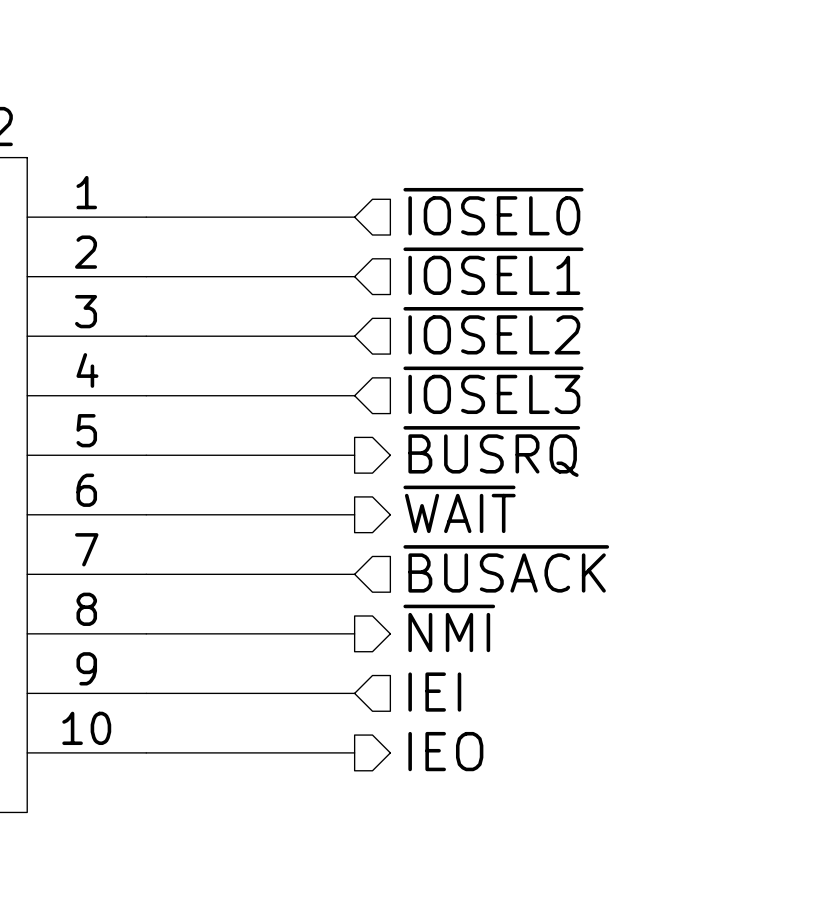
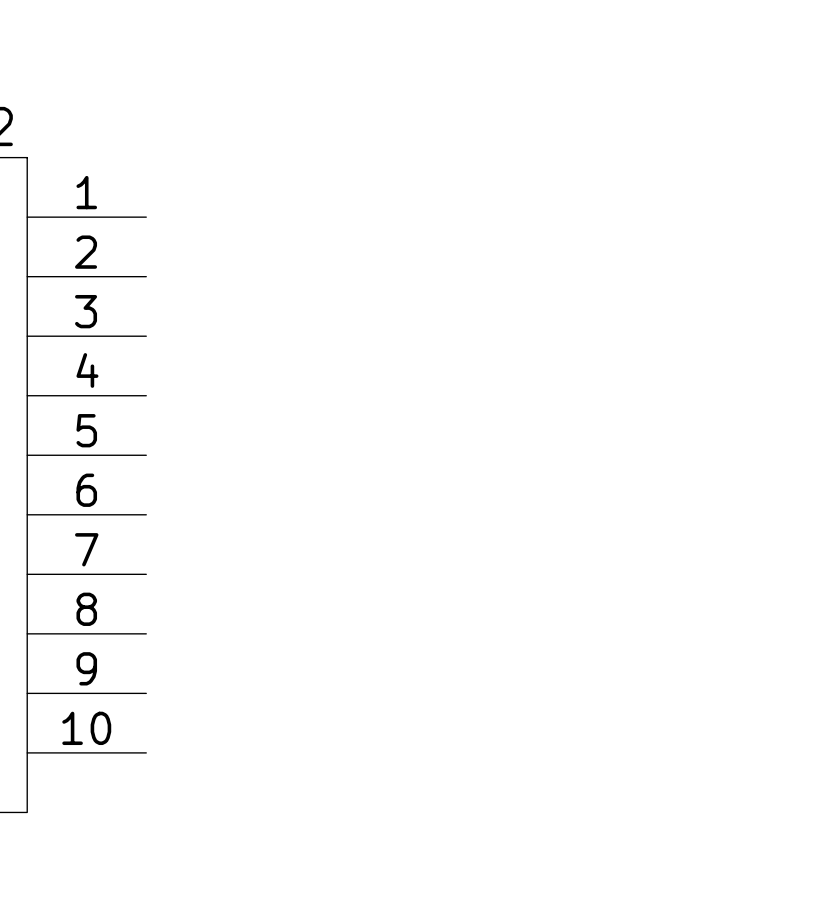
hierarchical label: ~{IOSEL0} (493, 211) -> none
wire: (146, 217) (354, 217) -> none
hierarchical label: ~{IOSEL1} (493, 271) -> none
wire: (146, 276) (354, 276) -> none
hierarchical label: ~{IOSEL2} (493, 330) -> none
wire: (146, 336) (354, 336) -> none
hierarchical label: ~{IOSEL3} (493, 390) -> none
wire: (146, 395) (354, 395) -> none
hierarchical label: ~{BUSRQ} (491, 451) -> none
wire: (146, 455) (354, 455) -> none
hierarchical label: ~{WAIT} (459, 509) -> none
wire: (146, 514) (354, 514) -> none
hierarchical label: ~{BUSACK} (506, 568) -> none
wire: (146, 574) (354, 574) -> none
hierarchical label: ~{NMI} (449, 628) -> none
wire: (146, 633) (354, 633) -> none
hierarchical label: IEI (434, 692) -> none
wire: (146, 693) (354, 693) -> none
hierarchical label: IEO (445, 751) -> none
wire: (146, 752) (354, 752) -> none

